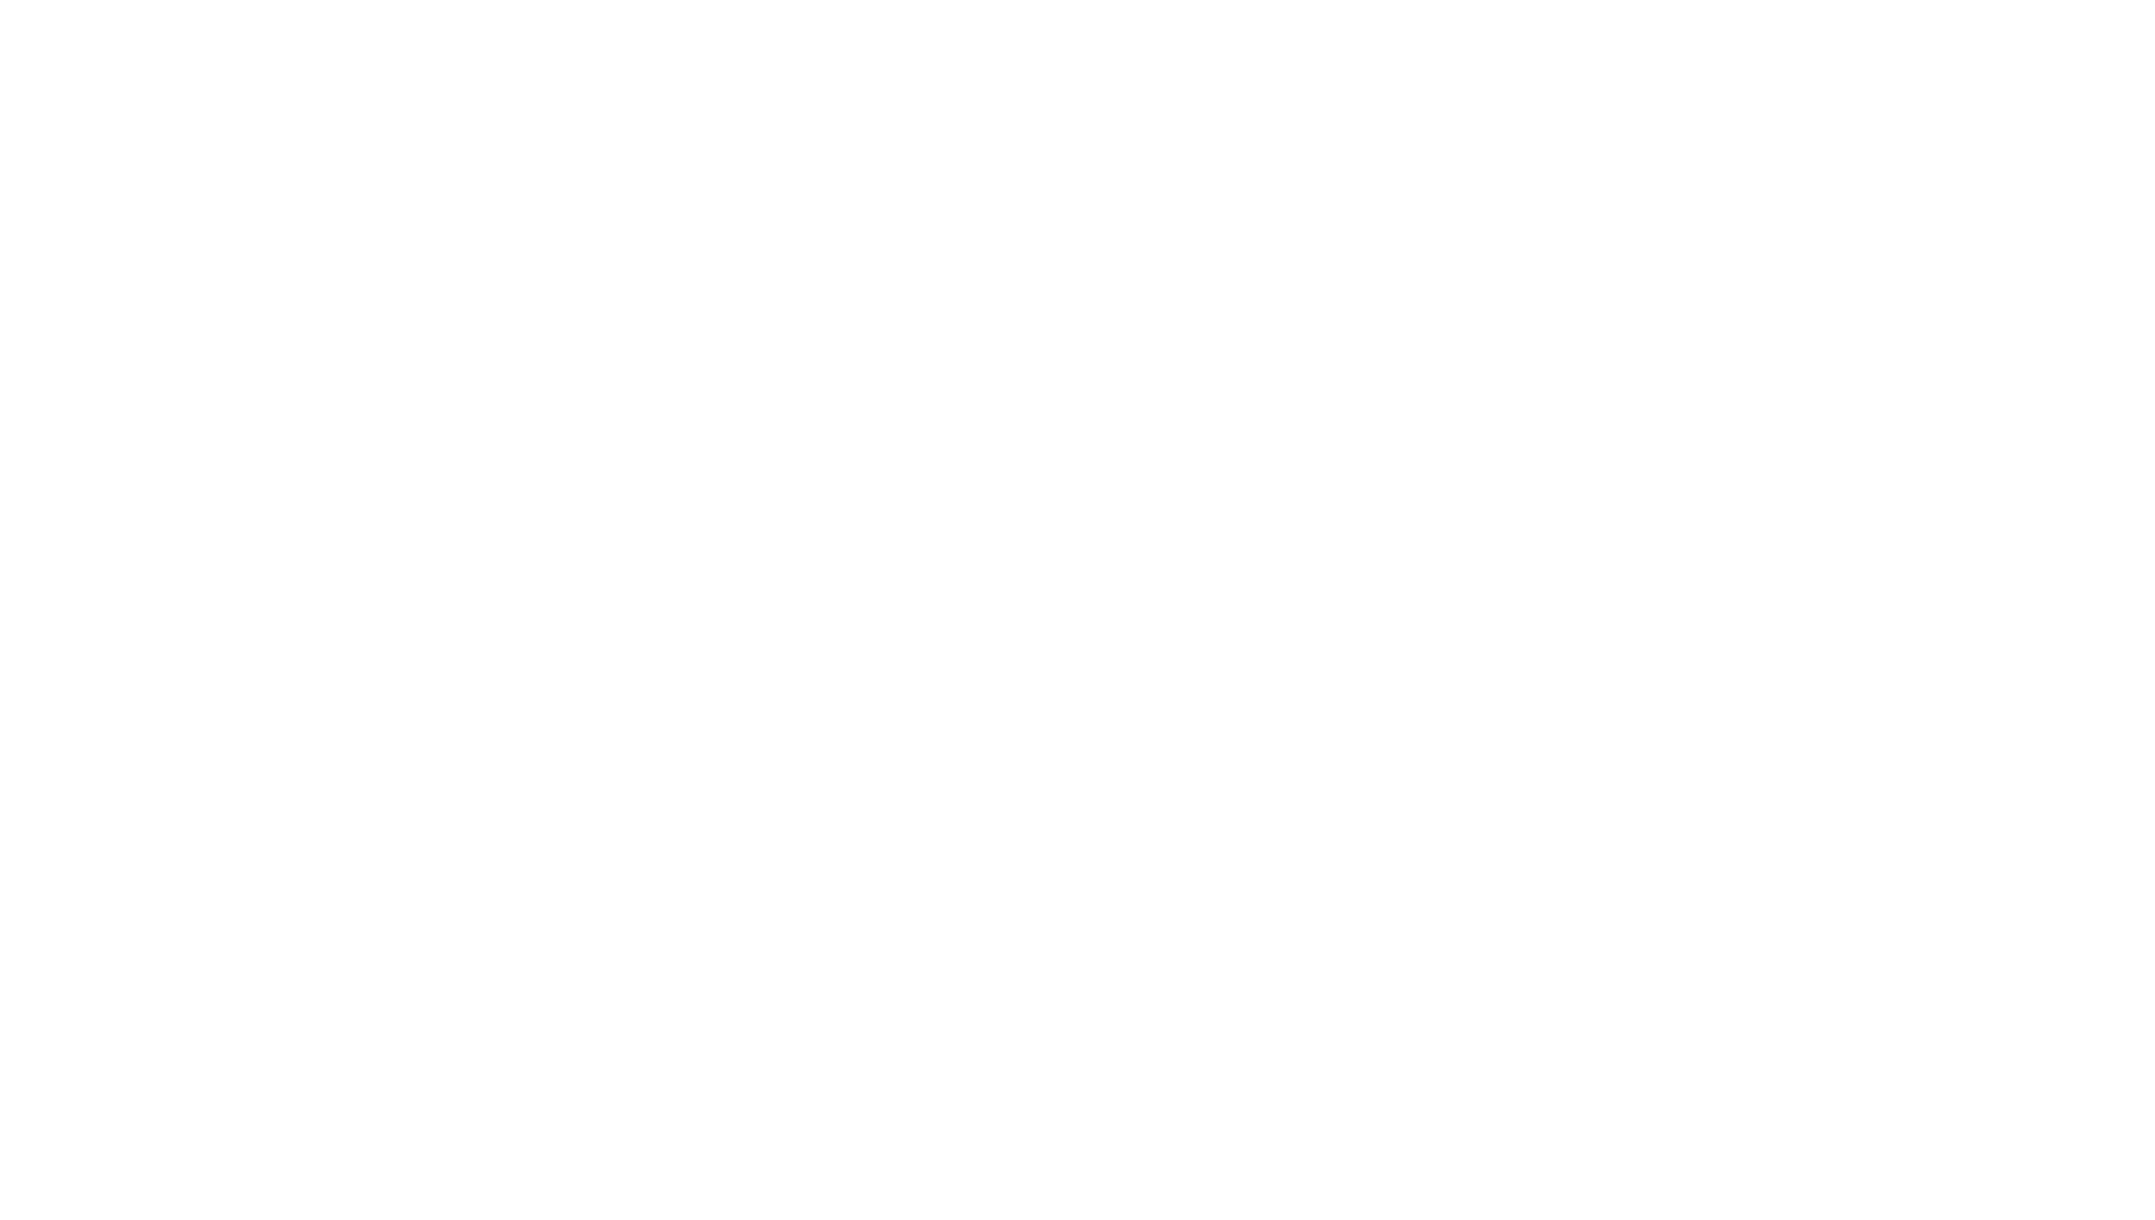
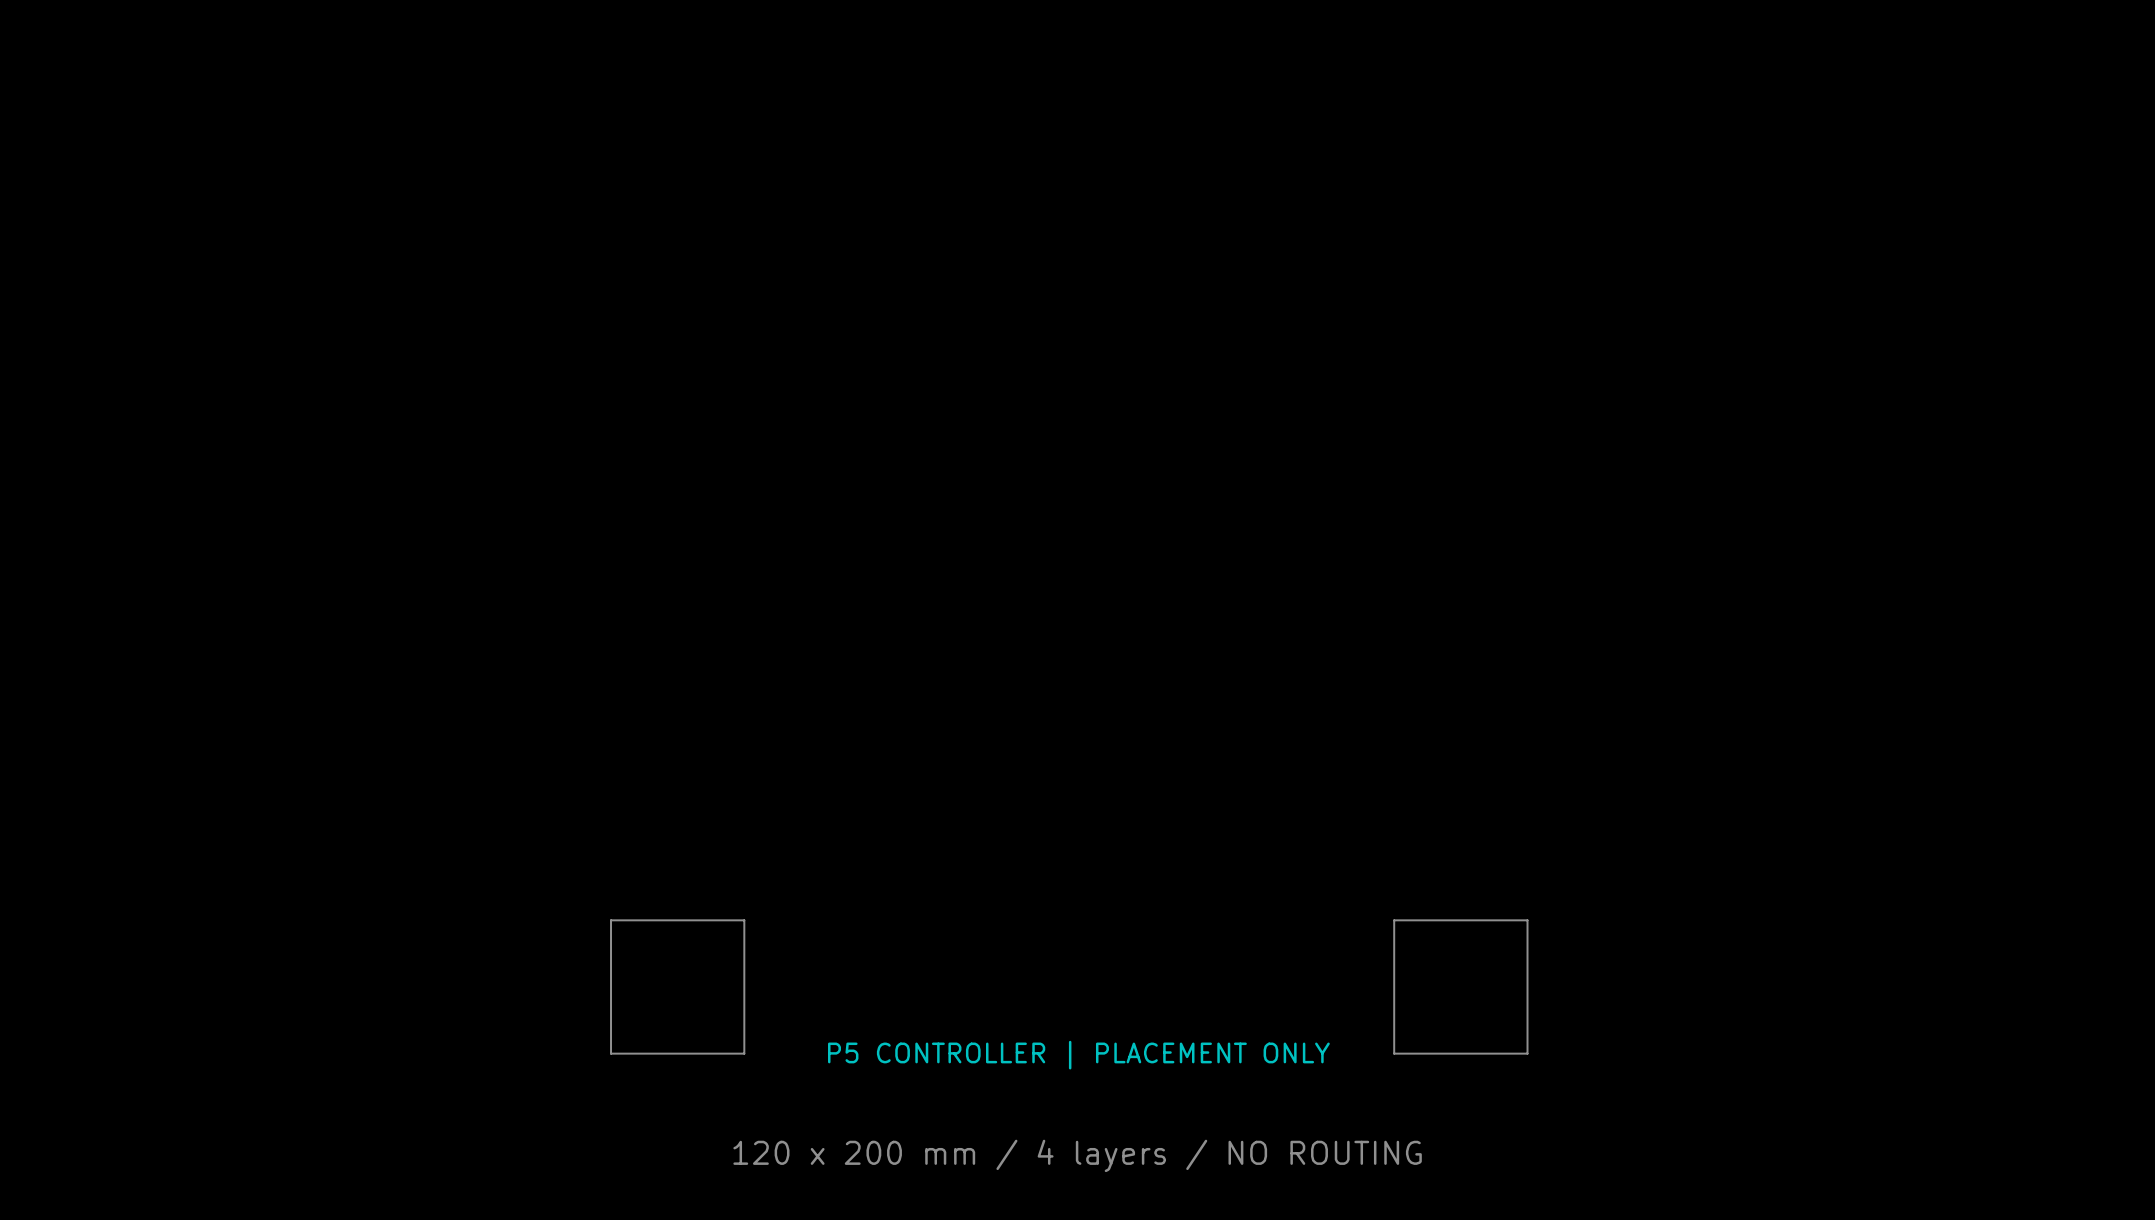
line: none -> (611, 920) (744, 920) (744, 1053) (611, 1053) (611, 920)
line: none -> (1394, 920) (1527, 920) (1527, 1053) (1394, 1053) (1394, 920)
text: none -> P5 CONTROLLER | PLACEMENT ONLY (1078, 1055)
text: none -> 120 x 200 mm / 4 layers / NO ROUTING (1077, 1155)

